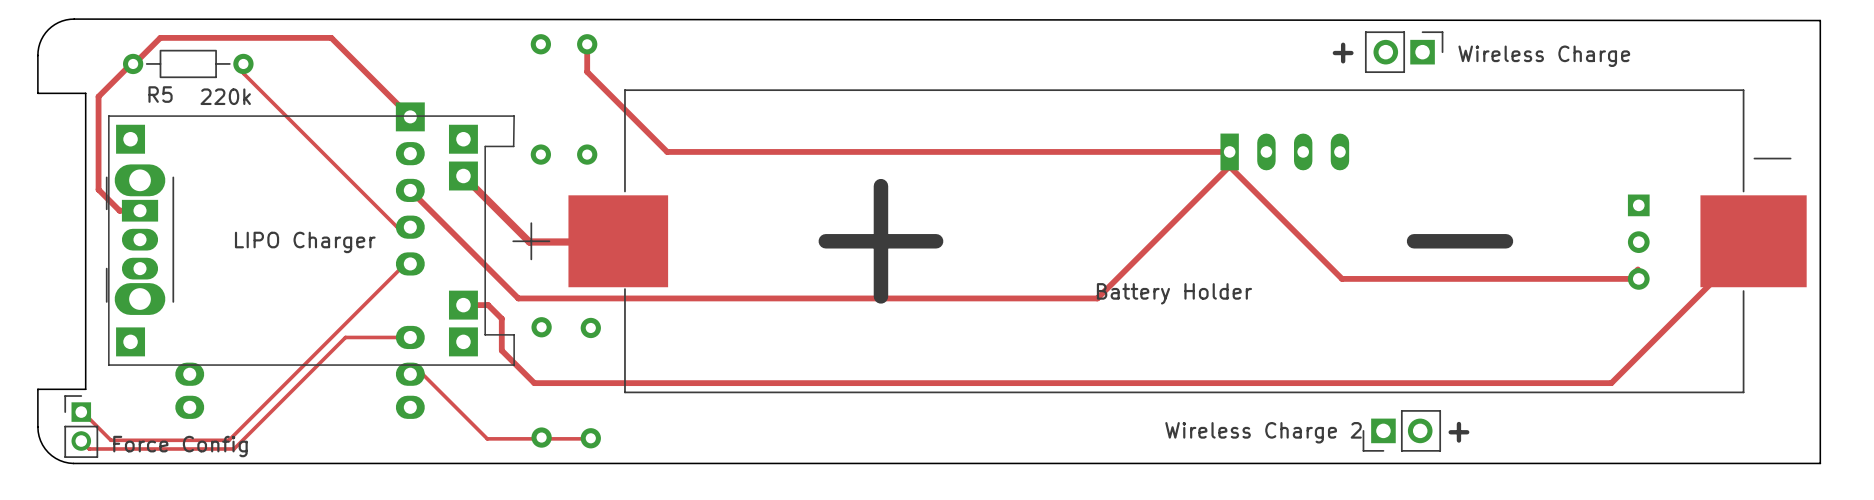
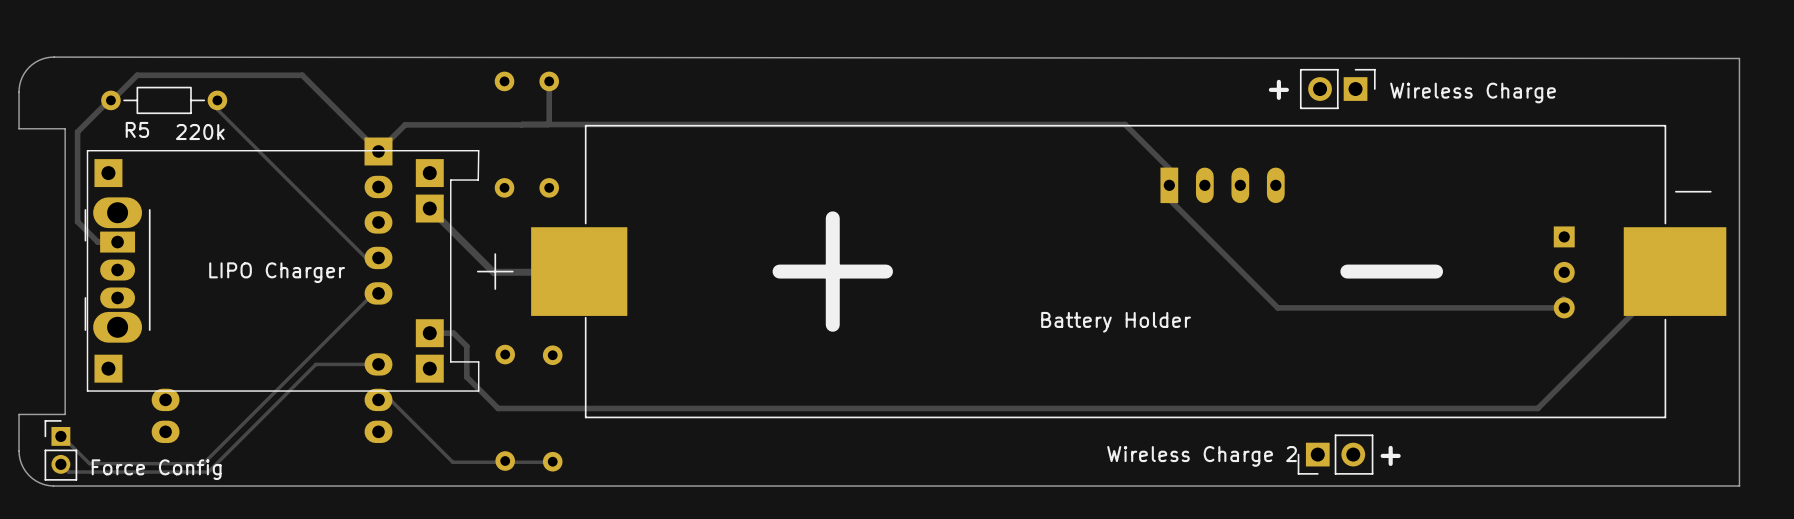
track: (587, 71) (667, 151) (1229, 151) -> (378, 151) (405, 124) (1125, 124) (1169, 168) (1169, 185)
track: none -> (549, 108) (548, 124)
track: (1229, 166) (1097, 298) (518, 298) (410, 190) -> none

